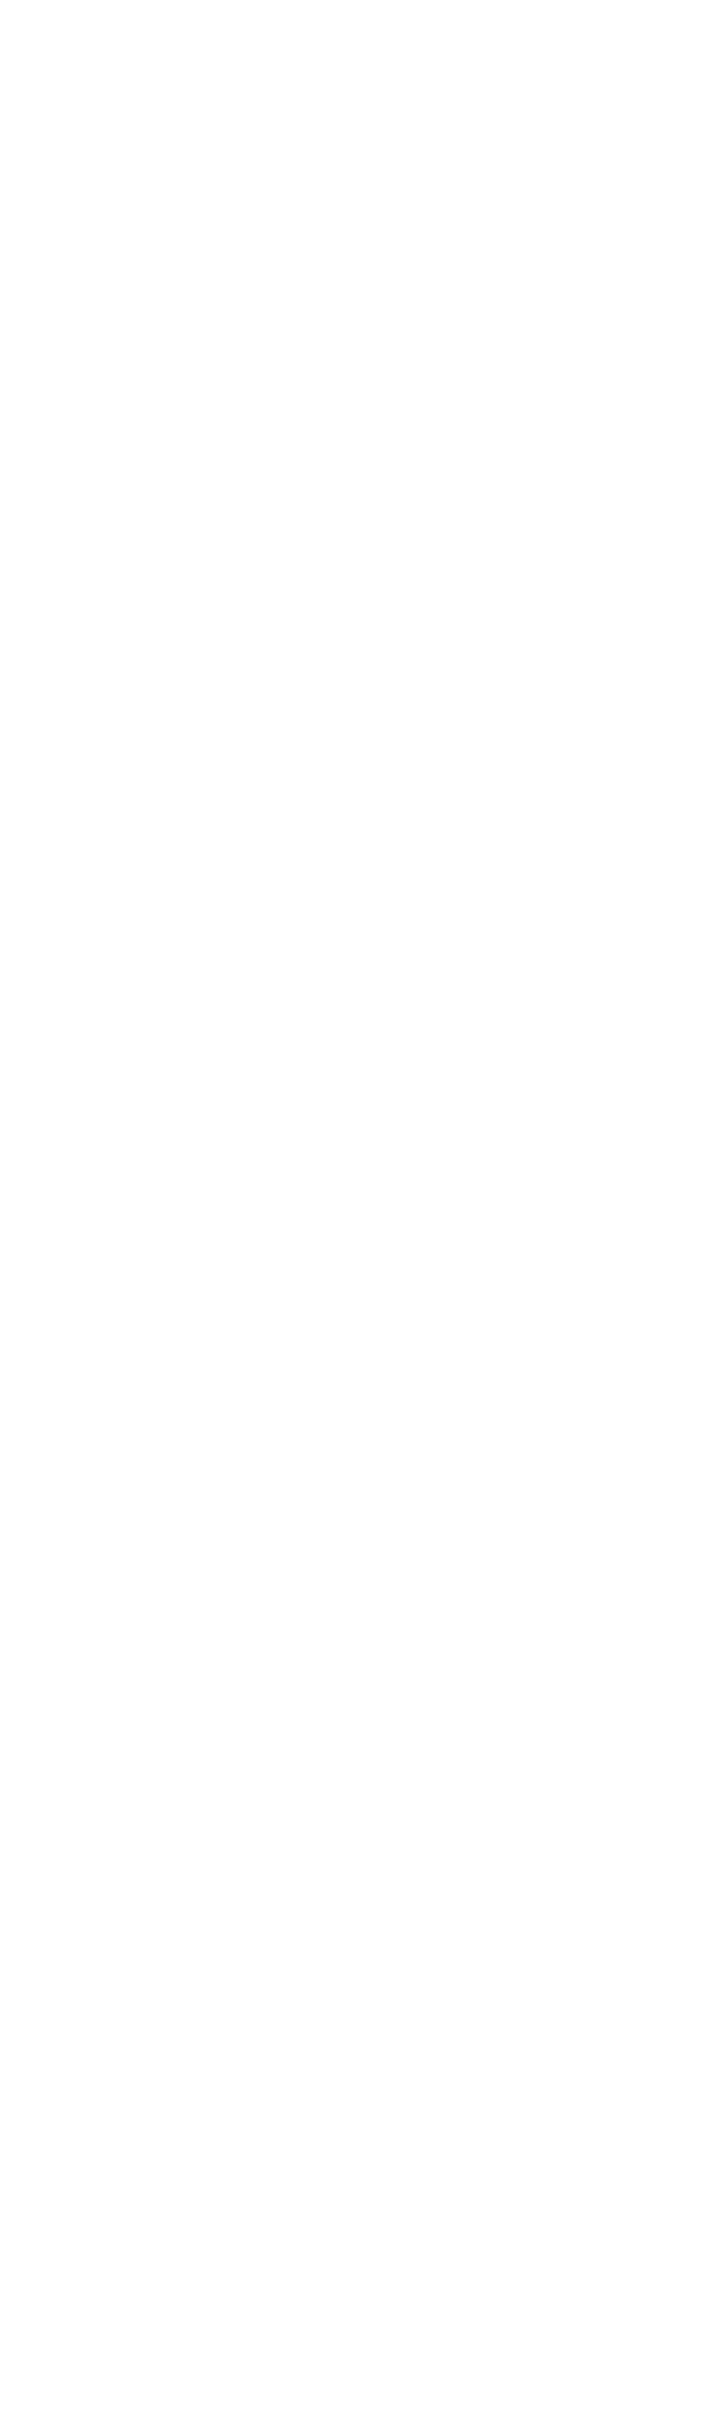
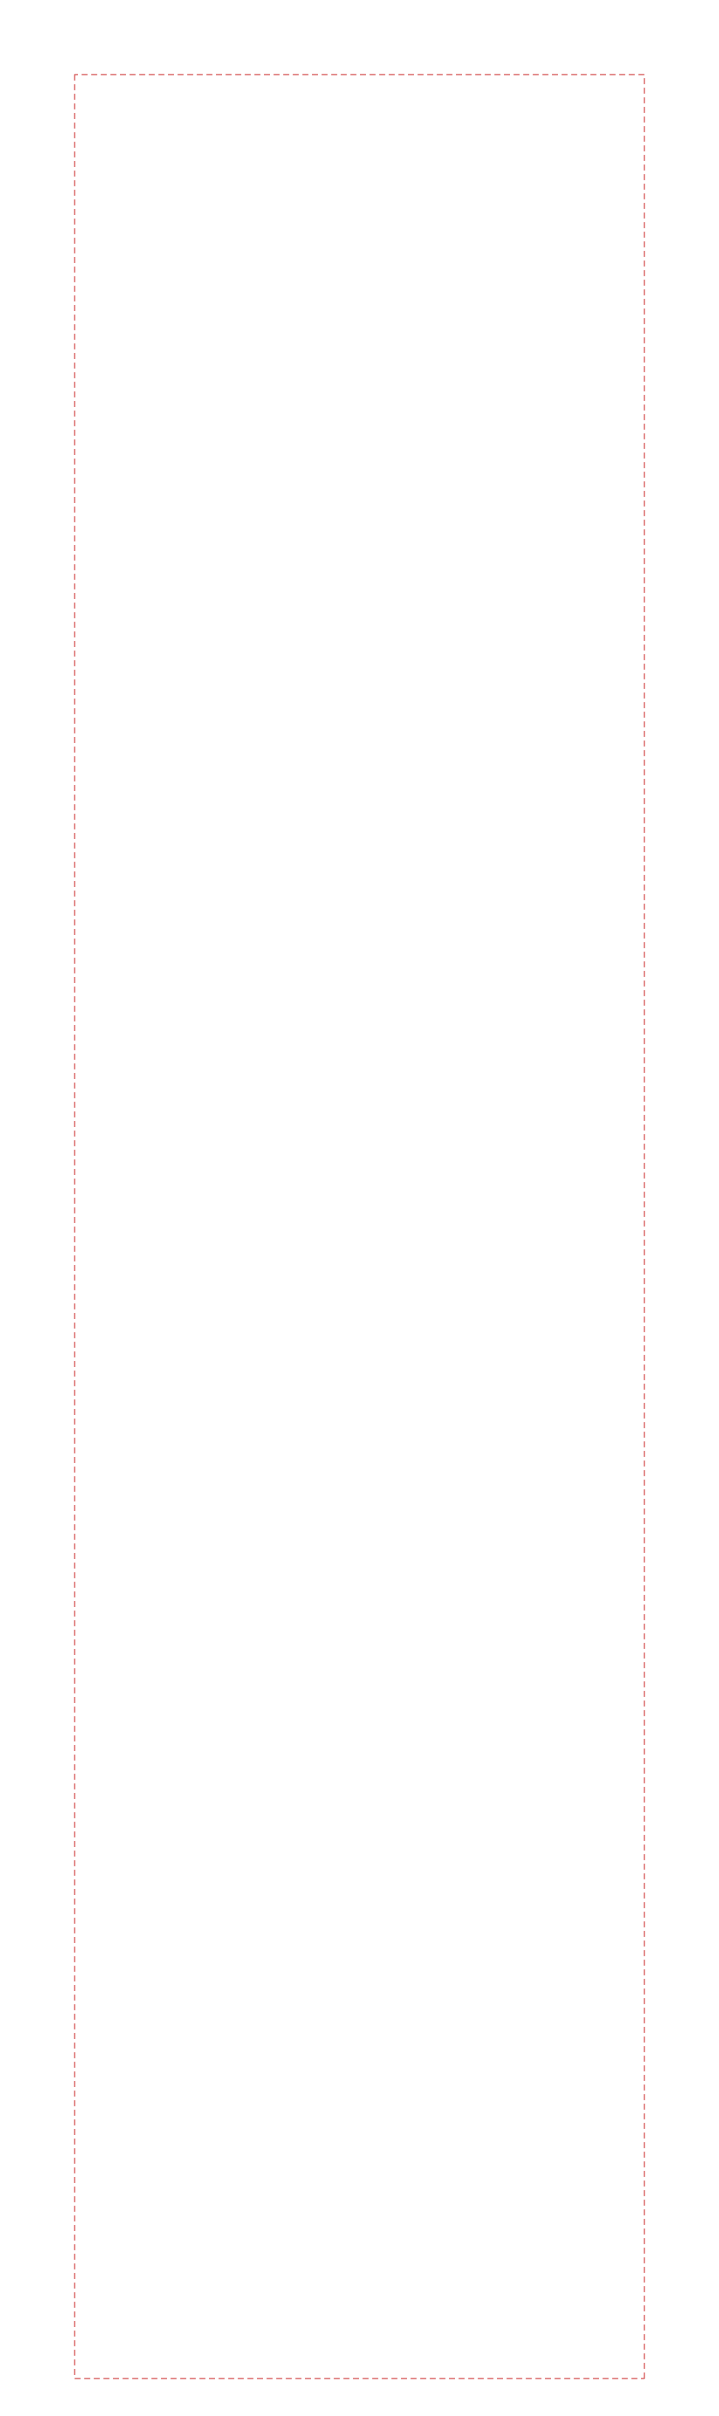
zone outline: none -> (74, 74) (644, 74) (644, 2378) (74, 2378) (74, 74)

